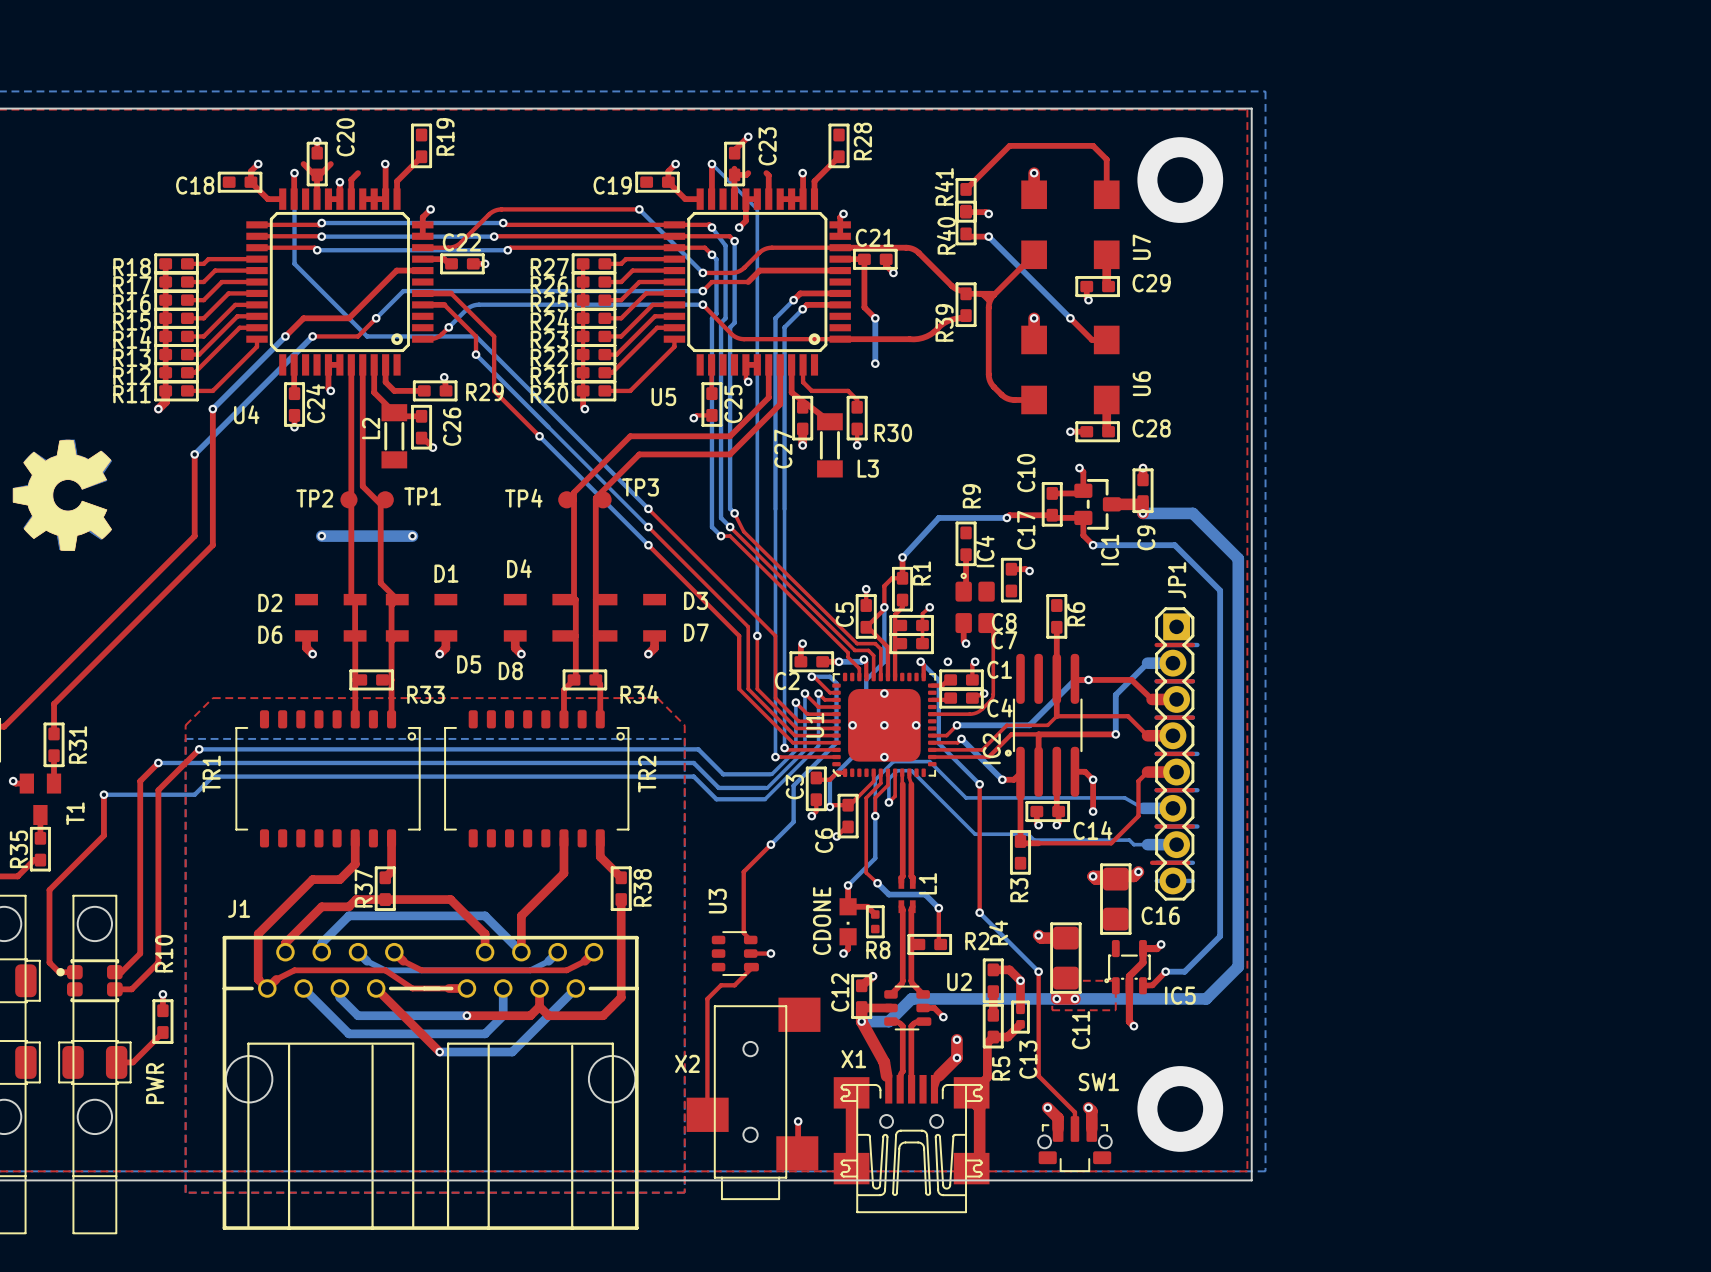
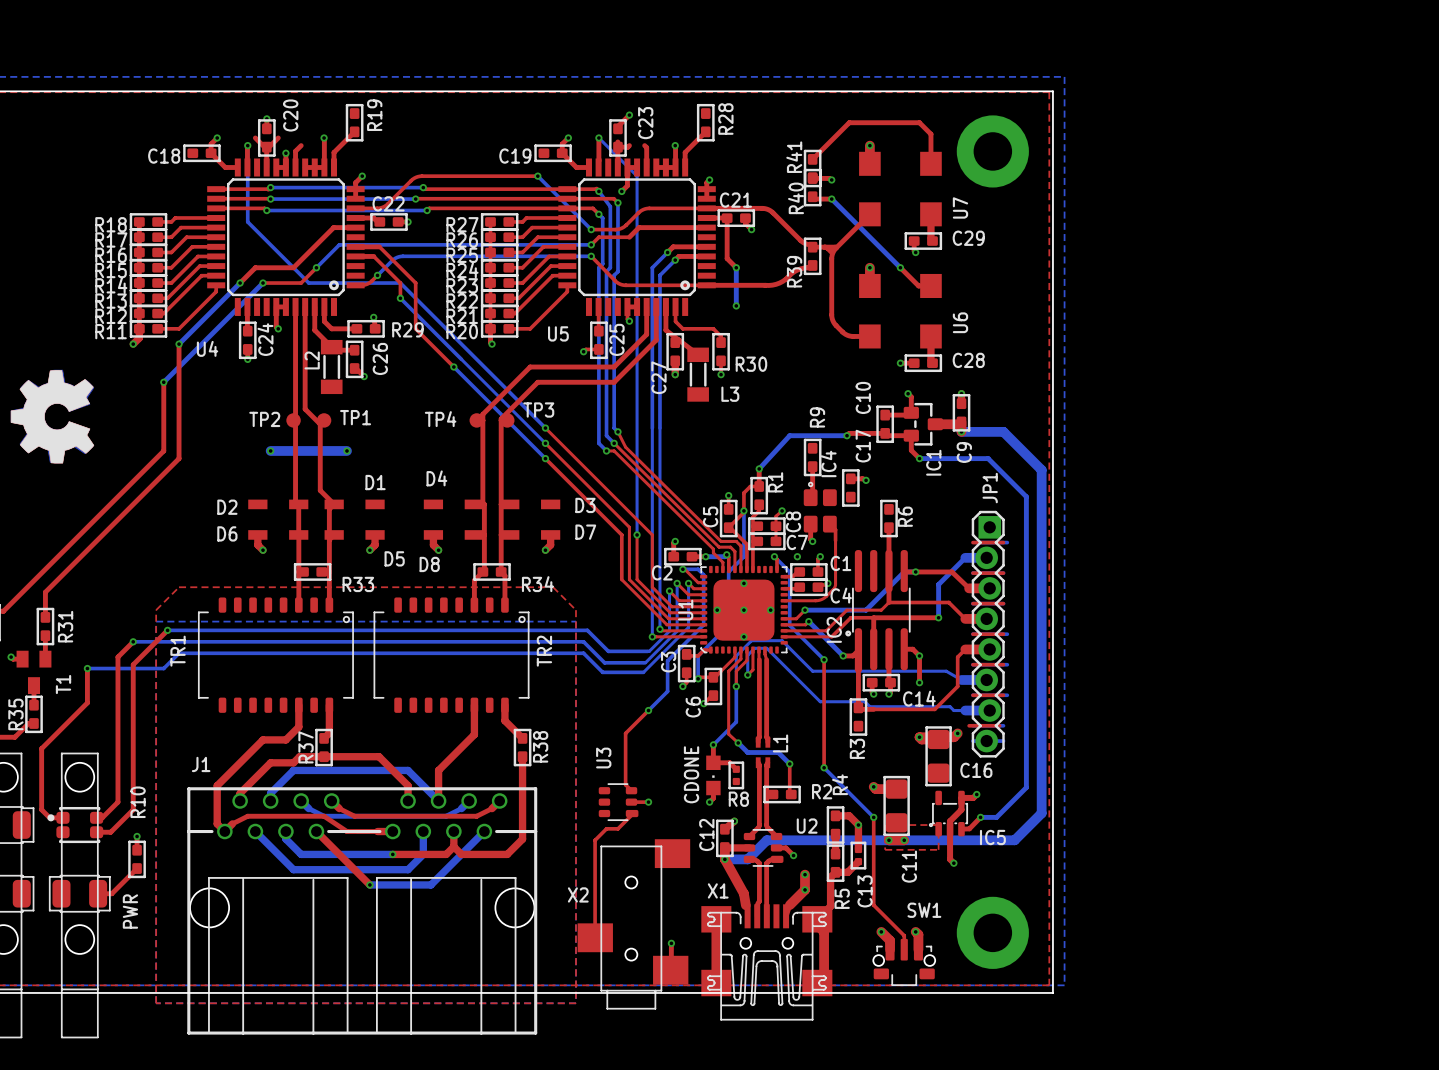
C8 name rotation: 0° (1004, 622) -> 90° counterclockwise (793, 521)
C8 name position: C8 (1004, 622) -> C8 (793, 521)
C7 name position: C7 (1004, 640) -> C7 (797, 542)

